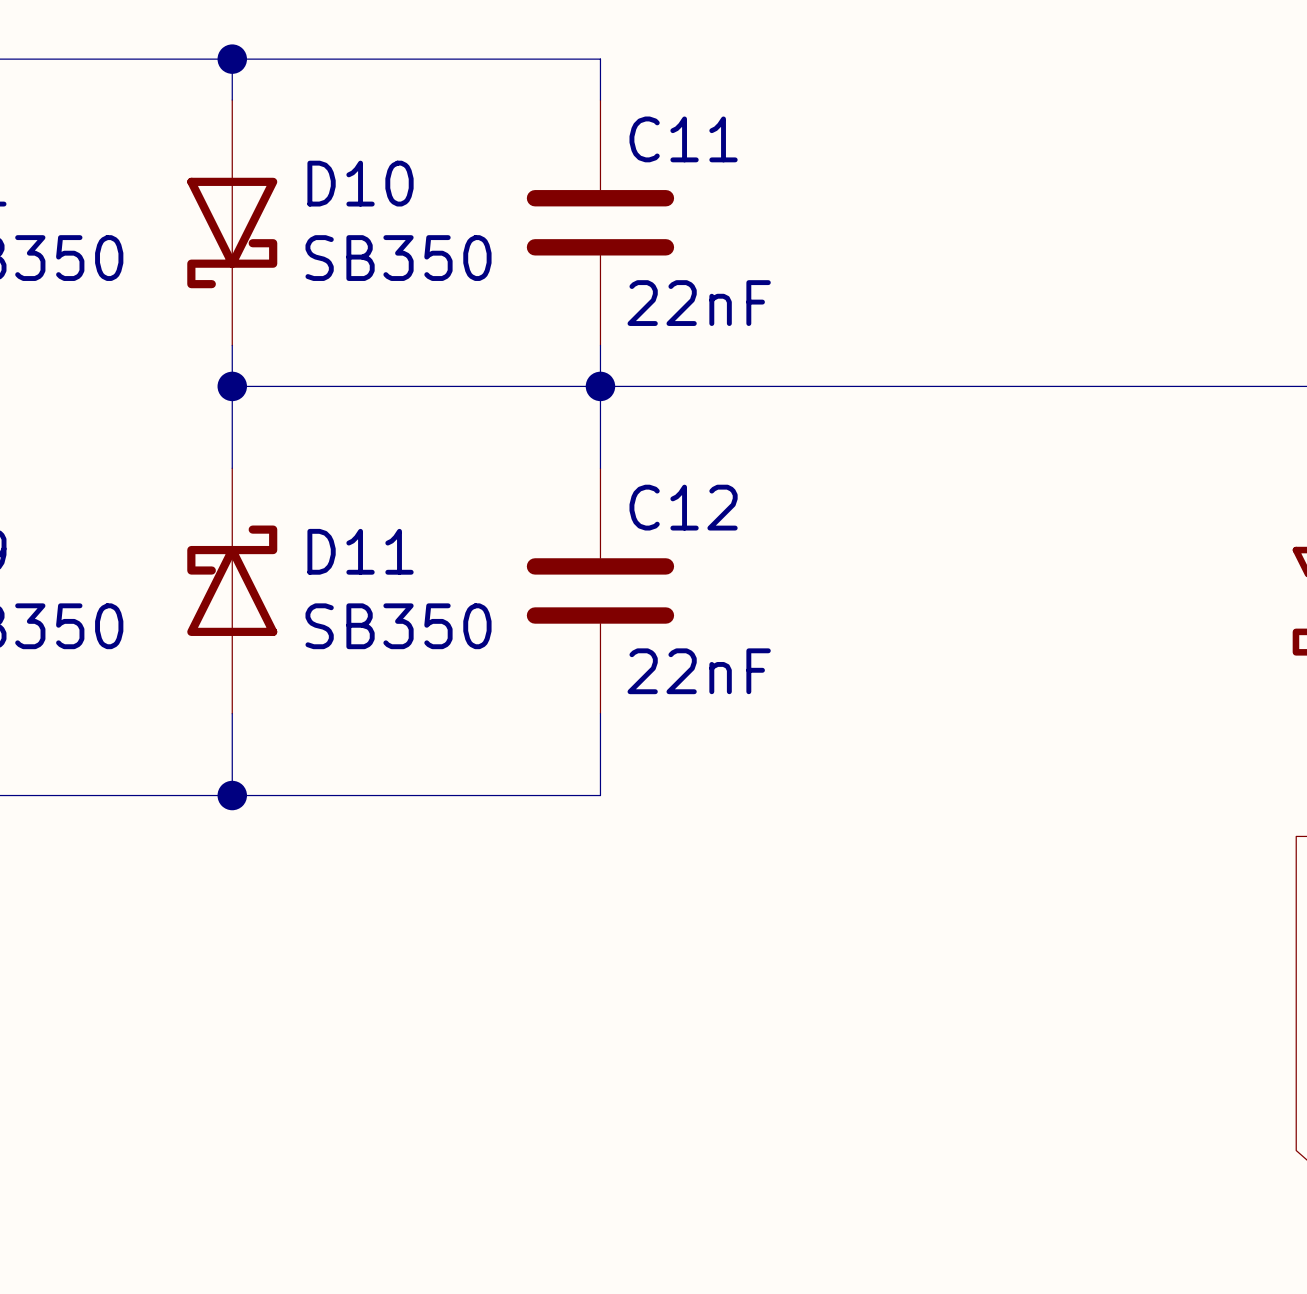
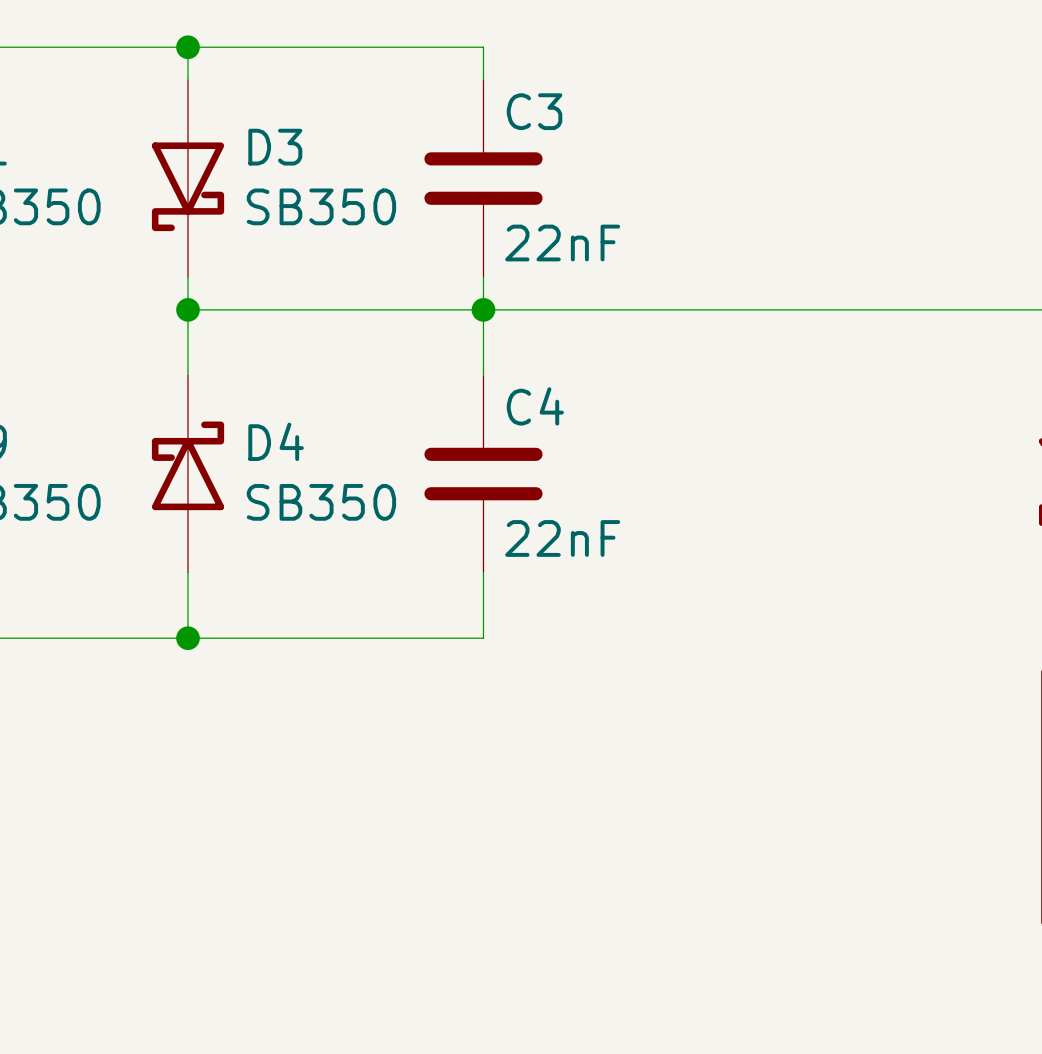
C11 name: C11 (683, 139) -> C3 (534, 111)
D10 name: D10 (360, 183) -> D3 (275, 147)
C12 name: C12 (683, 507) -> C4 (535, 406)
D11 name: D11 (360, 551) -> D4 (276, 441)

